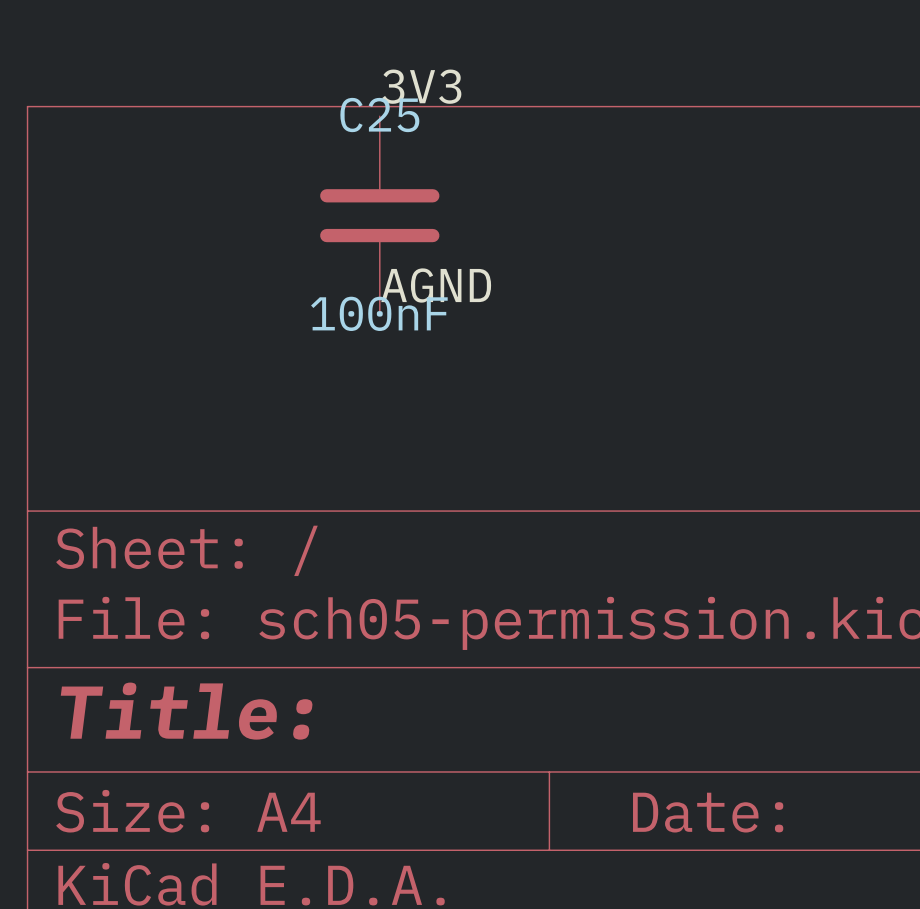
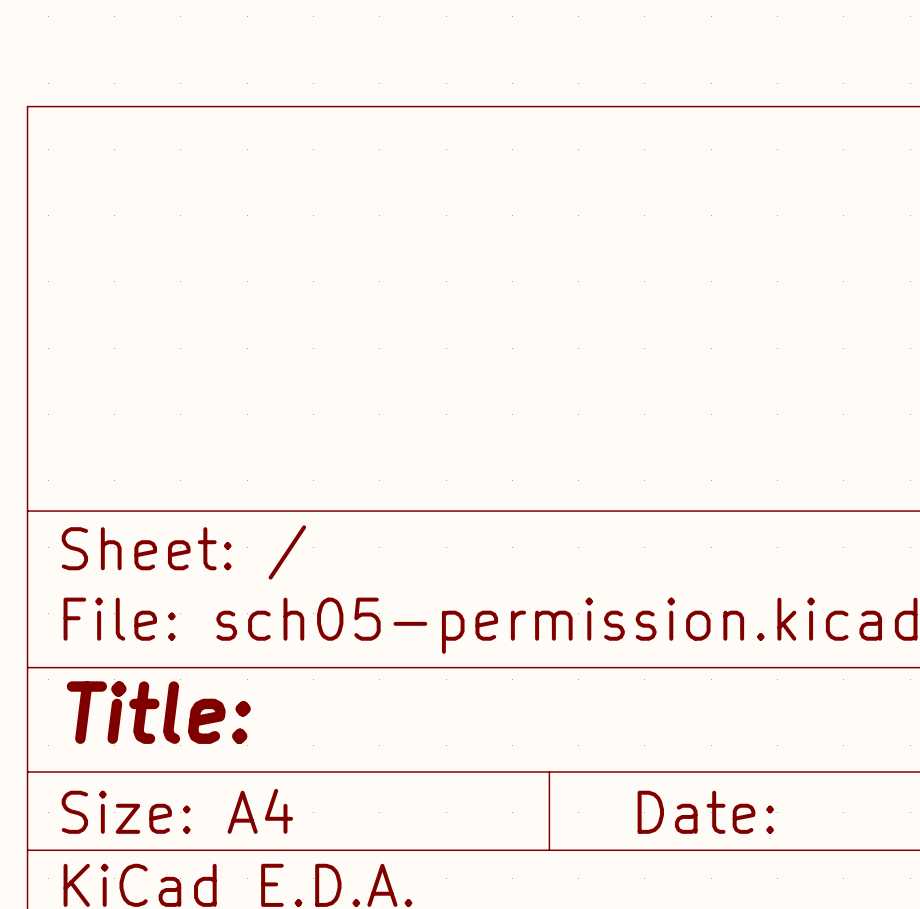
label: 3V3 (421, 86) -> none
C25: 100nF (379, 215) -> none
label: AGND (436, 285) -> none

